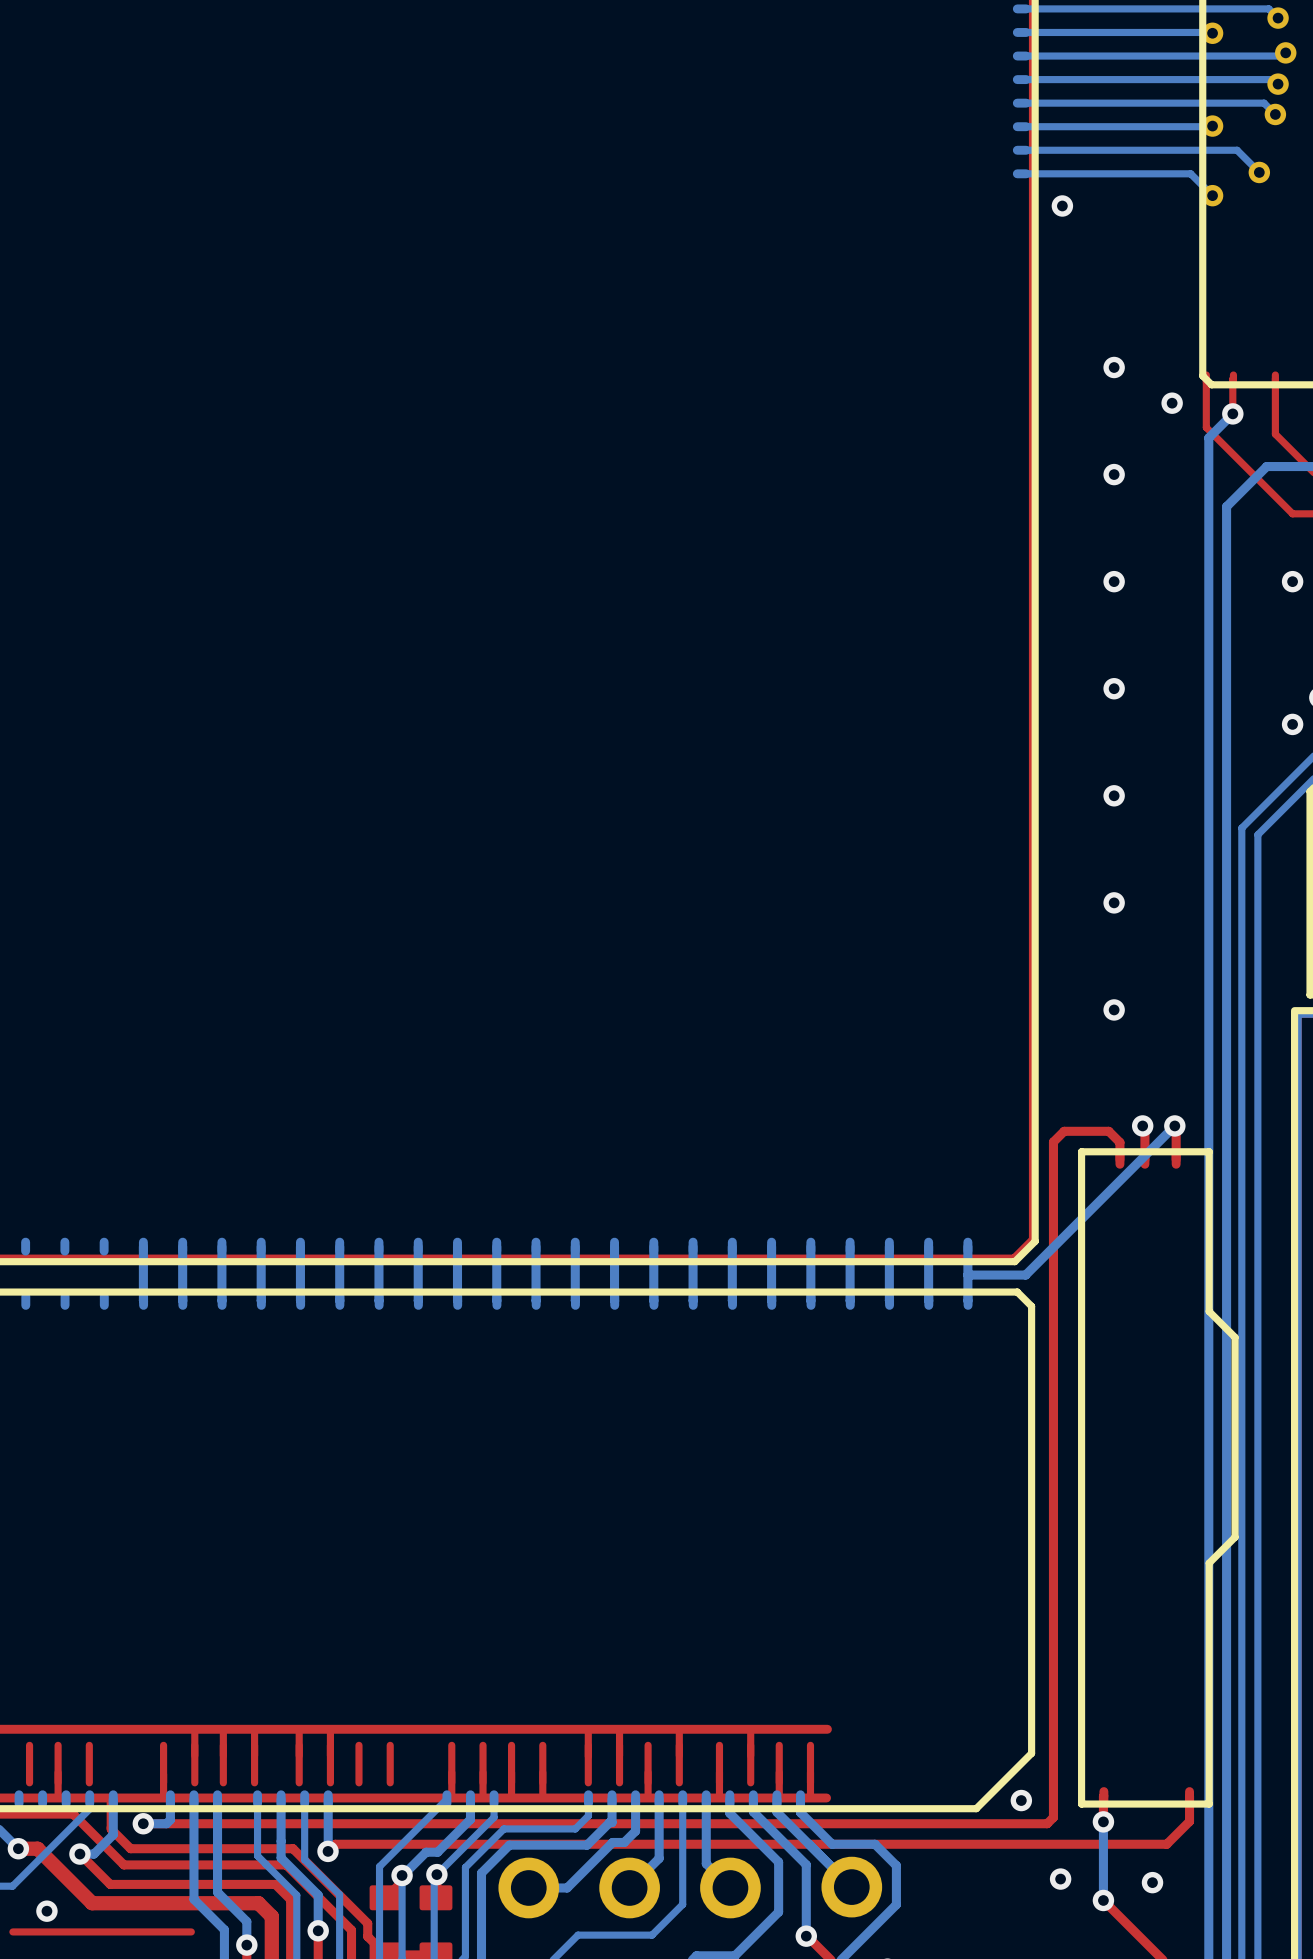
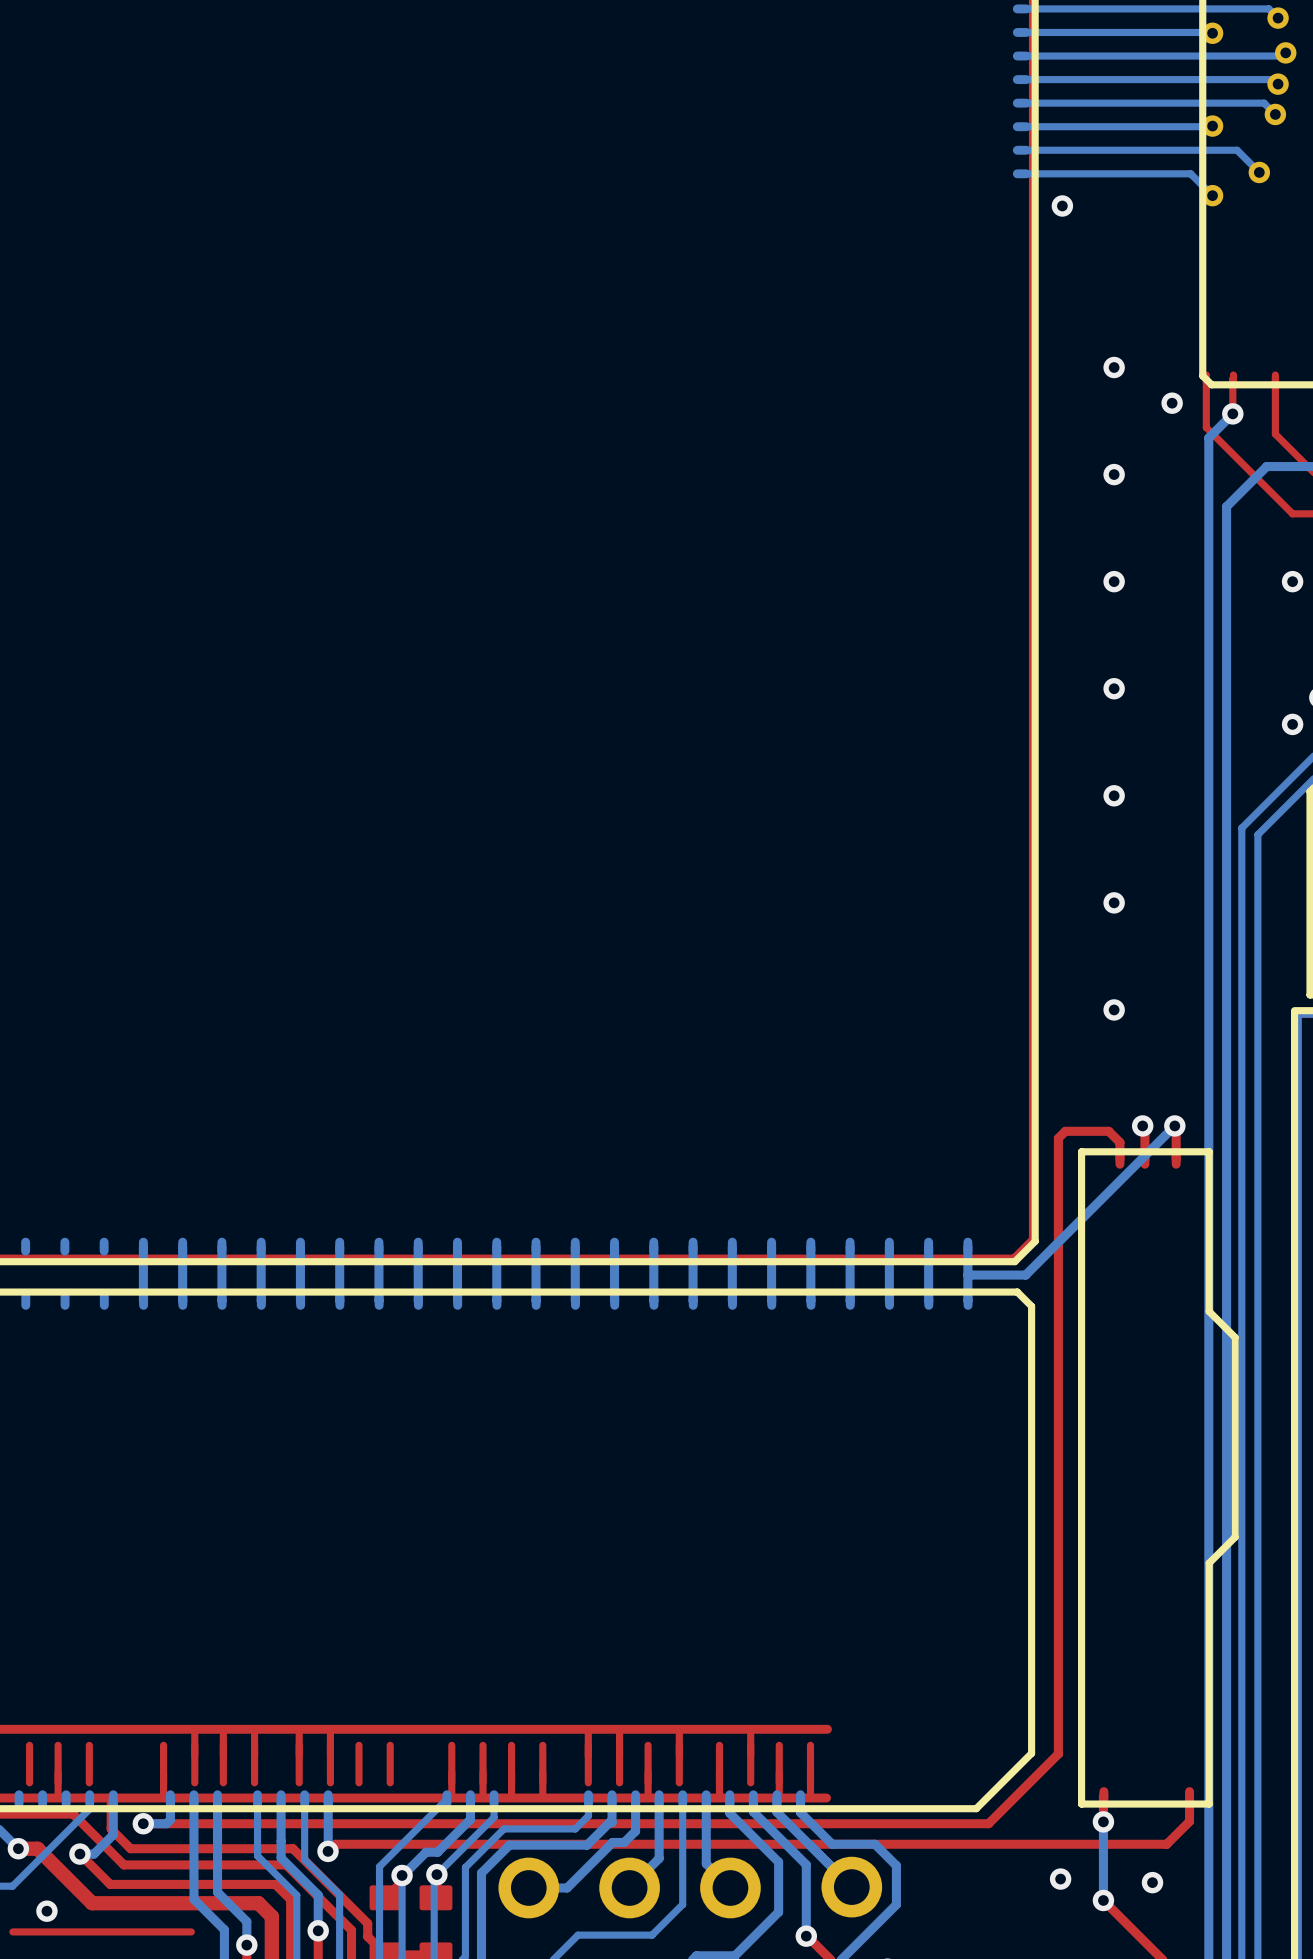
top track: (1065, 1131) (1053, 1142) (1053, 1817) (1047, 1823) (988, 1823) -> (1065, 1131) (1058, 1138) (1058, 1753) (988, 1823)
via: (1021, 1800) -> none

